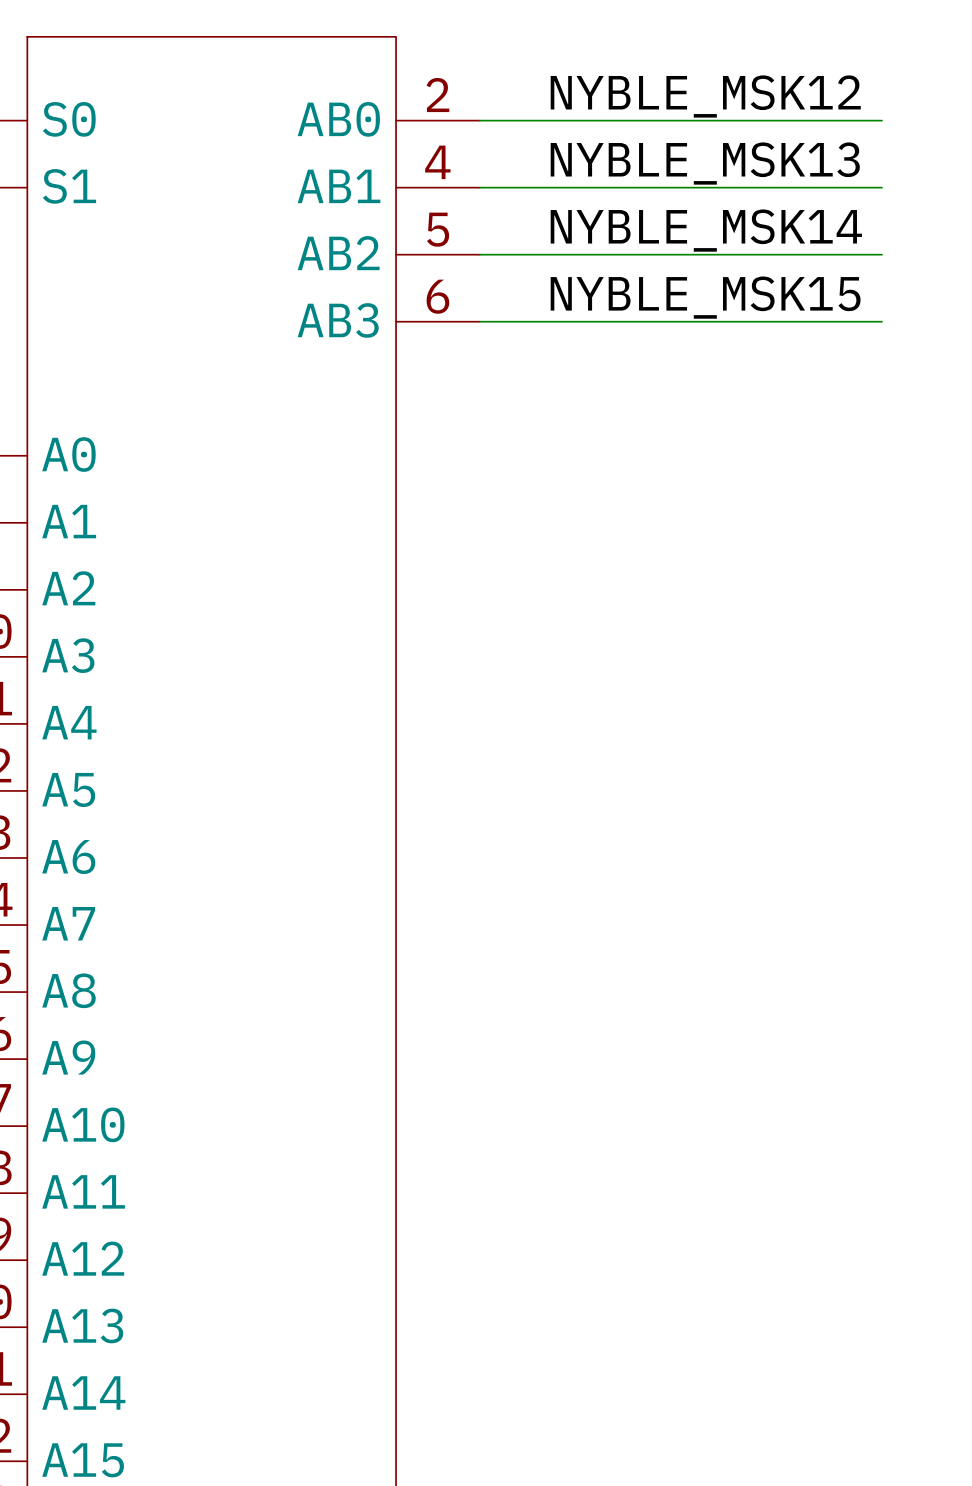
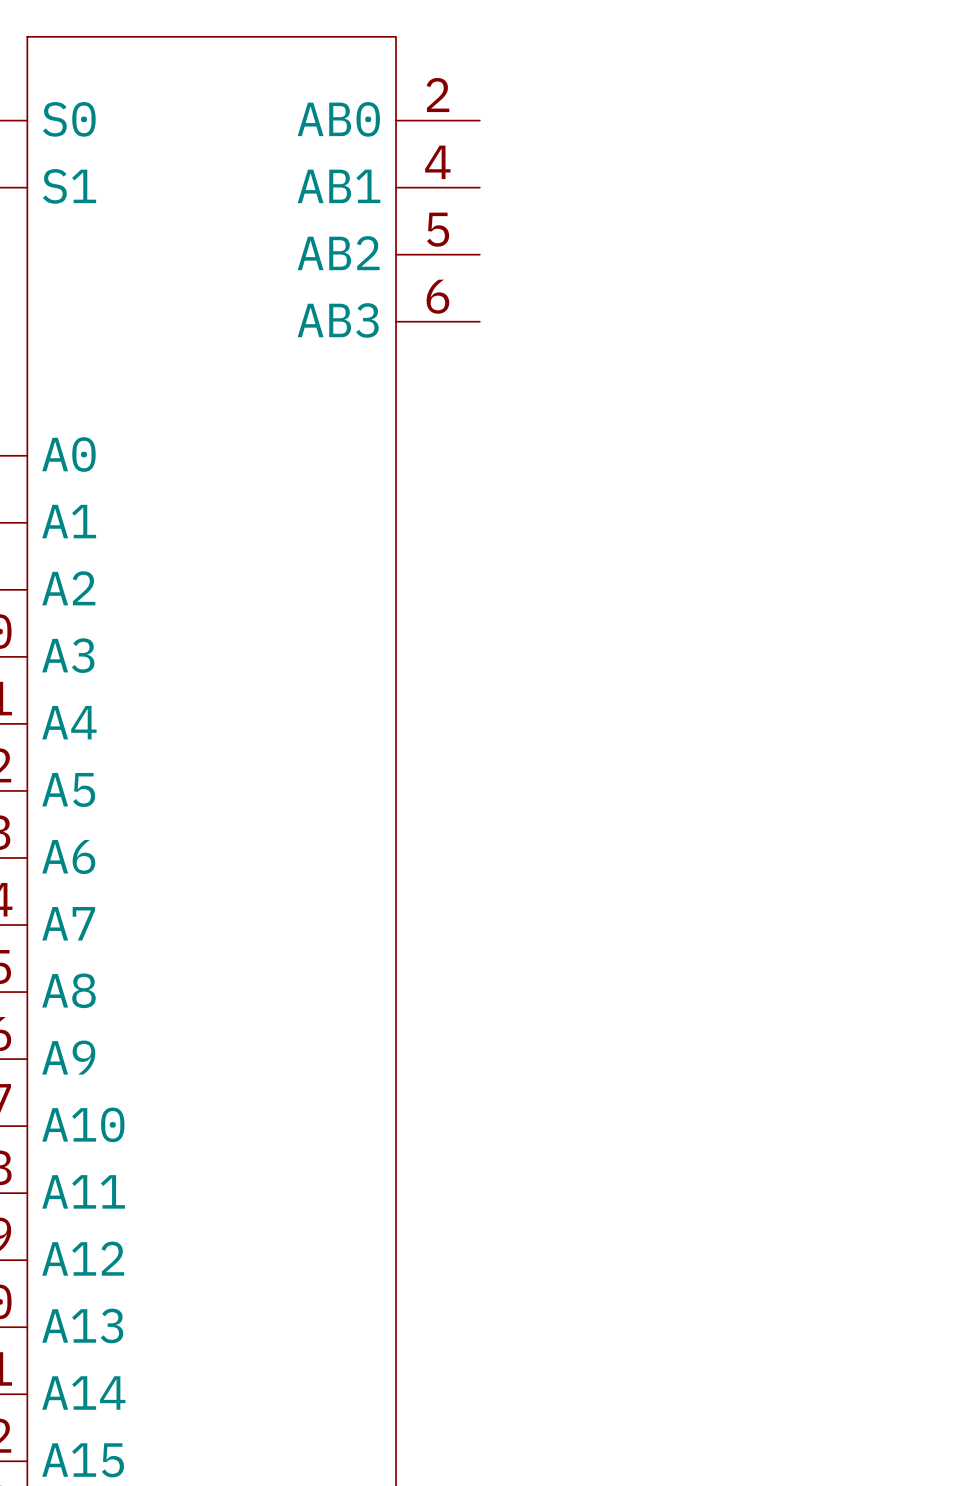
label: NYBLE_MSK12 (705, 96) -> none
wire: (479, 120) (882, 120) -> none
label: NYBLE_MSK13 (705, 163) -> none
wire: (479, 187) (882, 187) -> none
label: NYBLE_MSK14 (706, 230) -> none
wire: (479, 254) (882, 254) -> none
label: NYBLE_MSK15 (705, 297) -> none
wire: (479, 321) (882, 321) -> none

